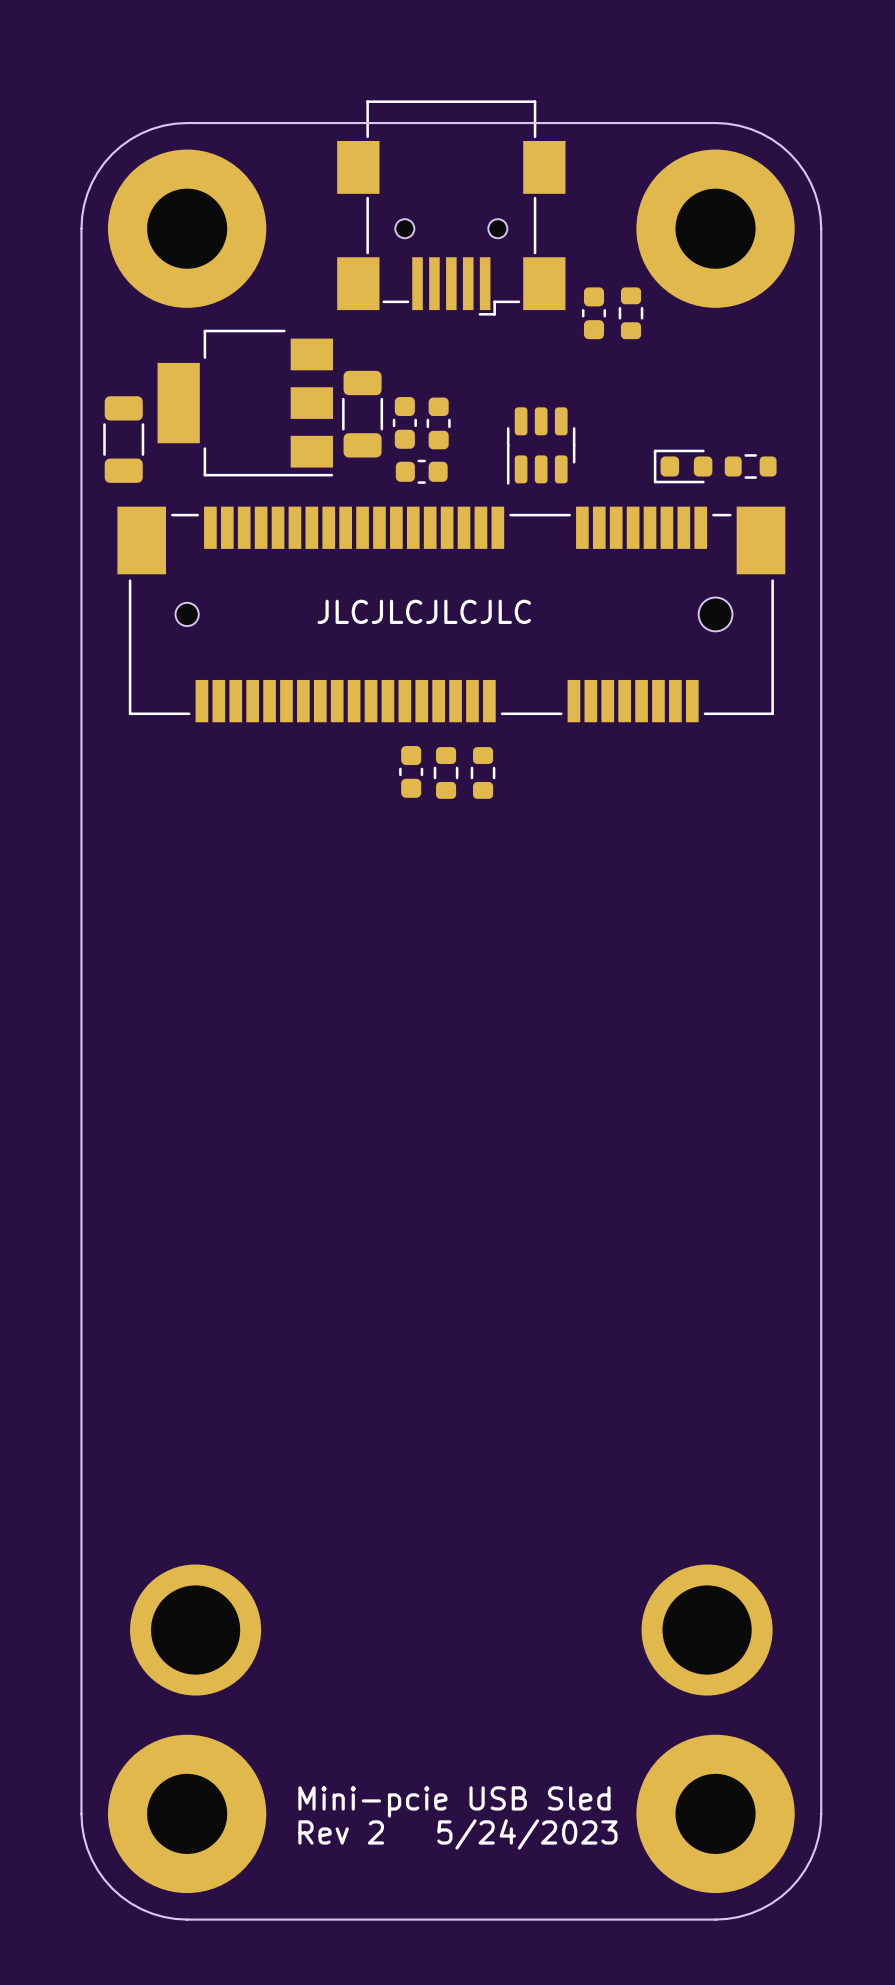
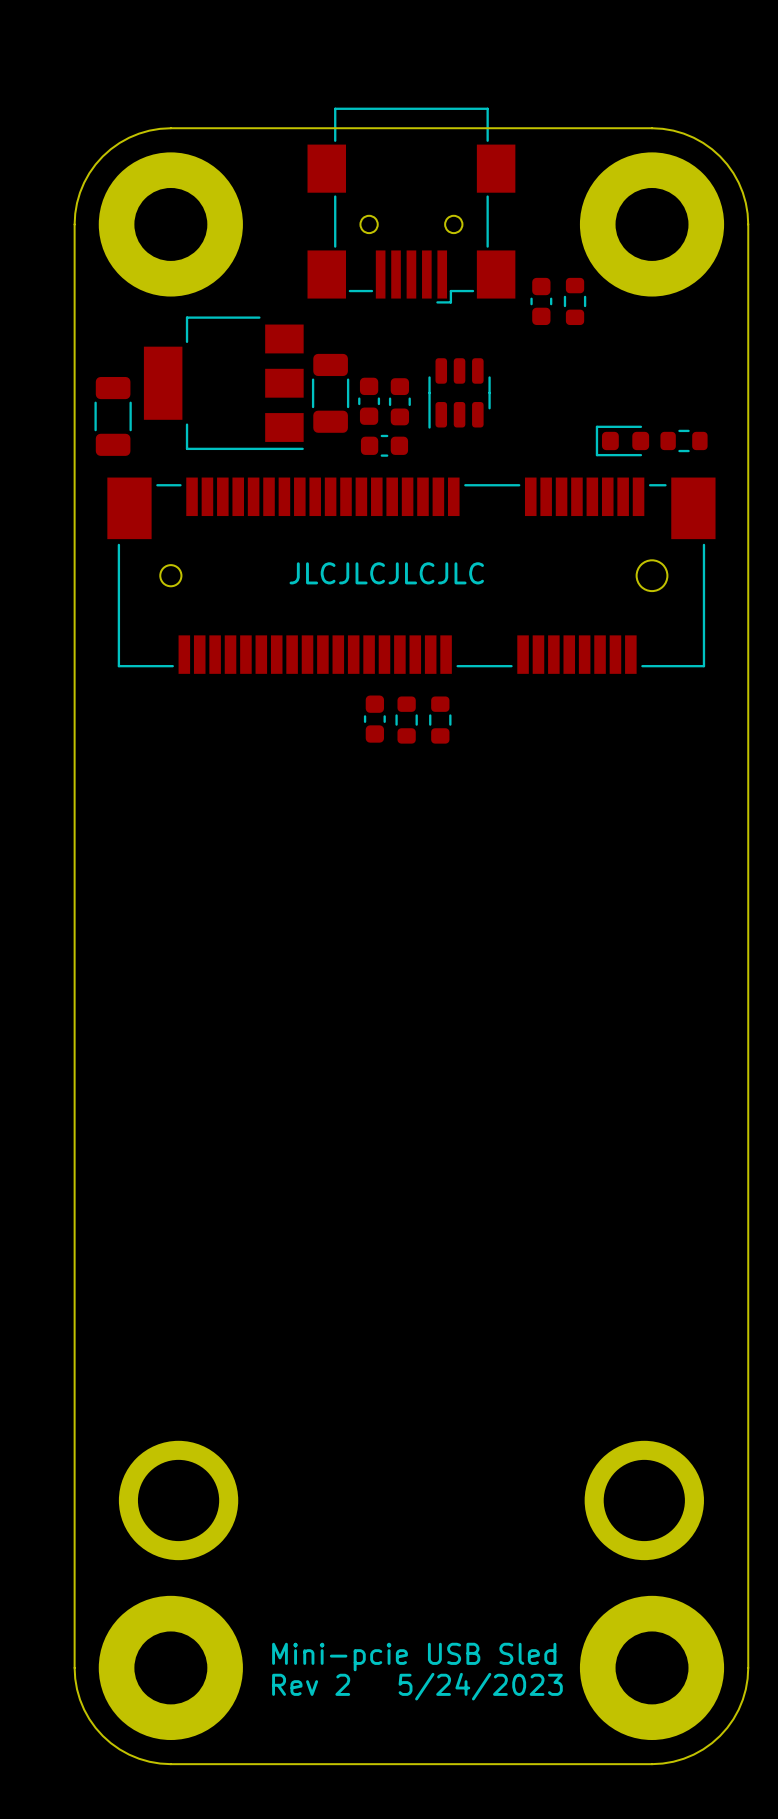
part position: (541, 445) -> (459, 393)

